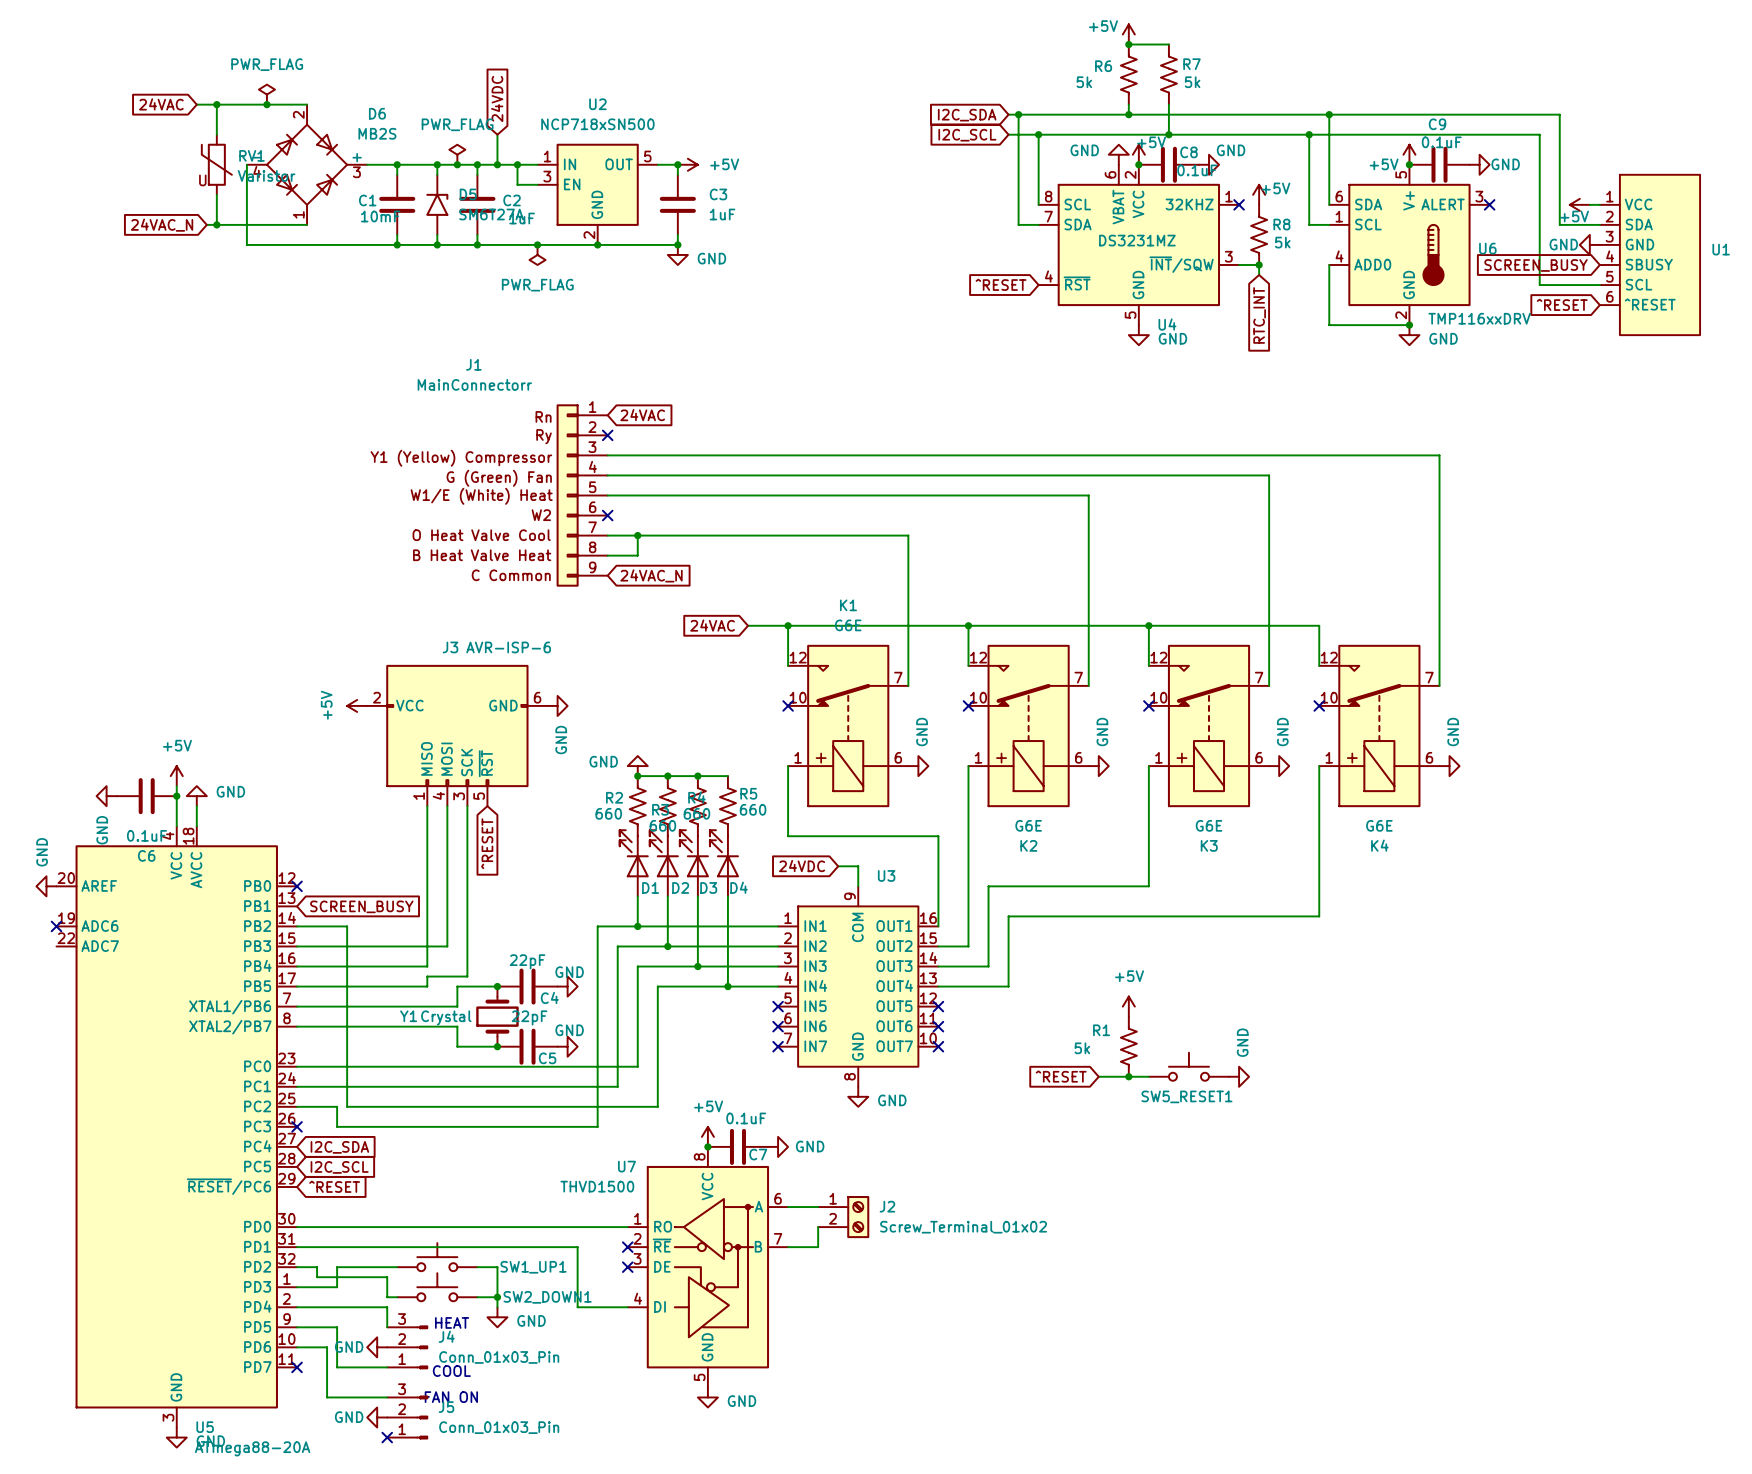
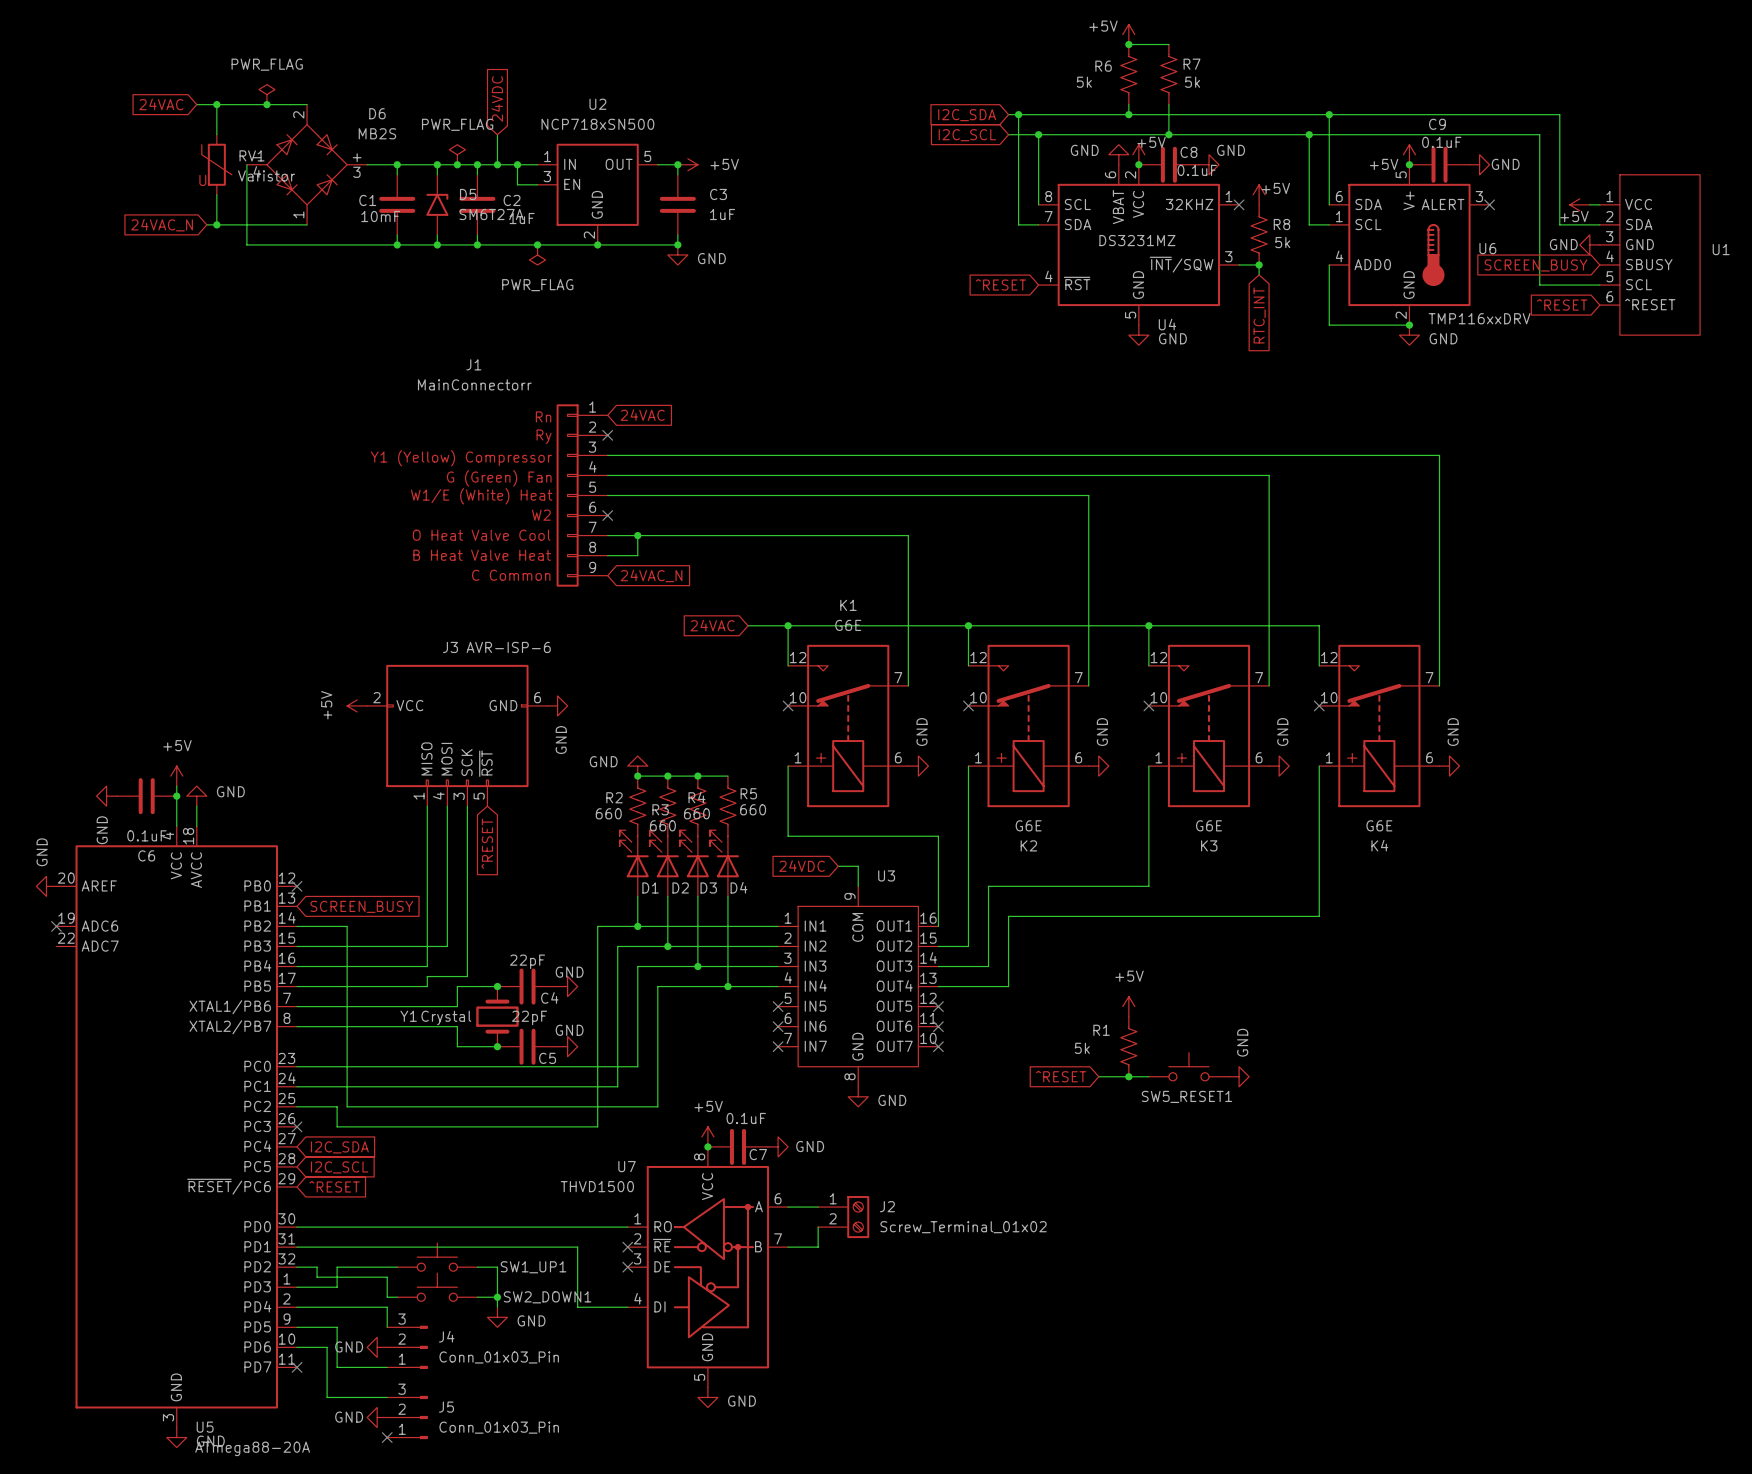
text: HEAT (452, 1322) -> none
text: COOL (451, 1371) -> none
text: FAN ON (451, 1397) -> none

